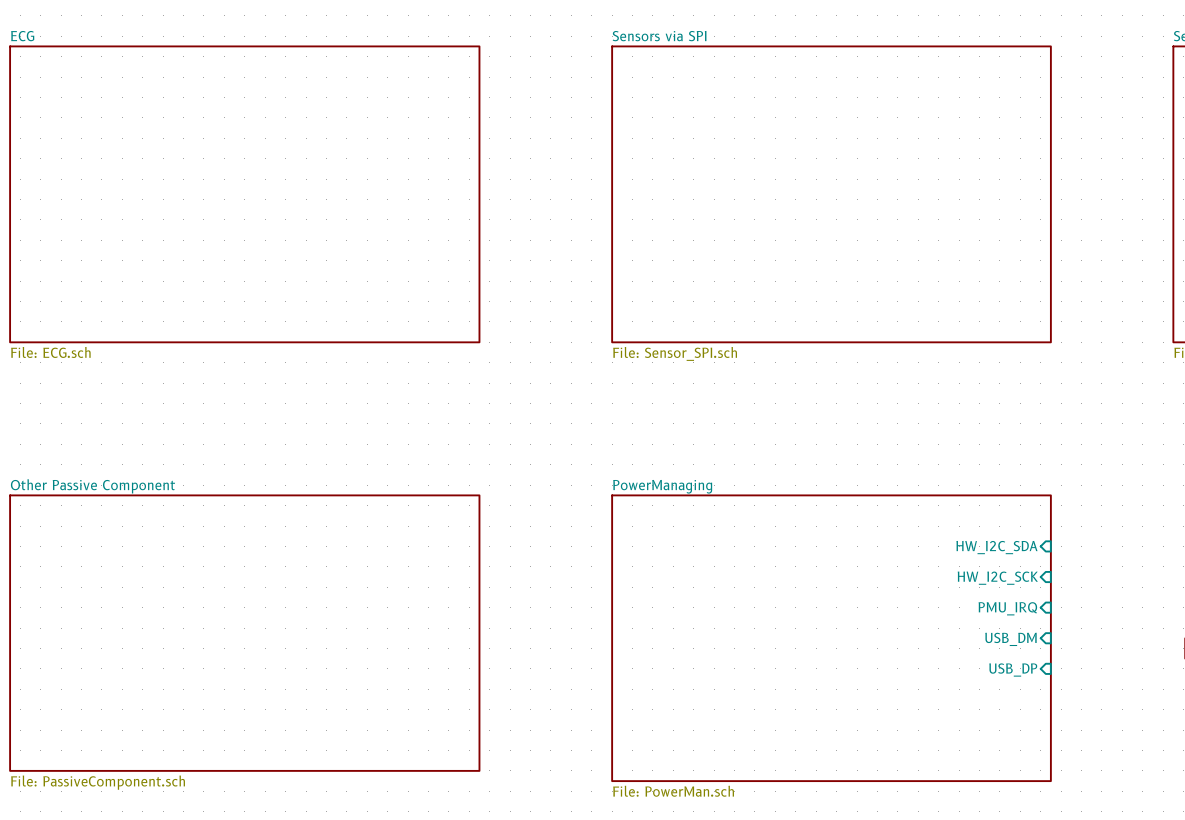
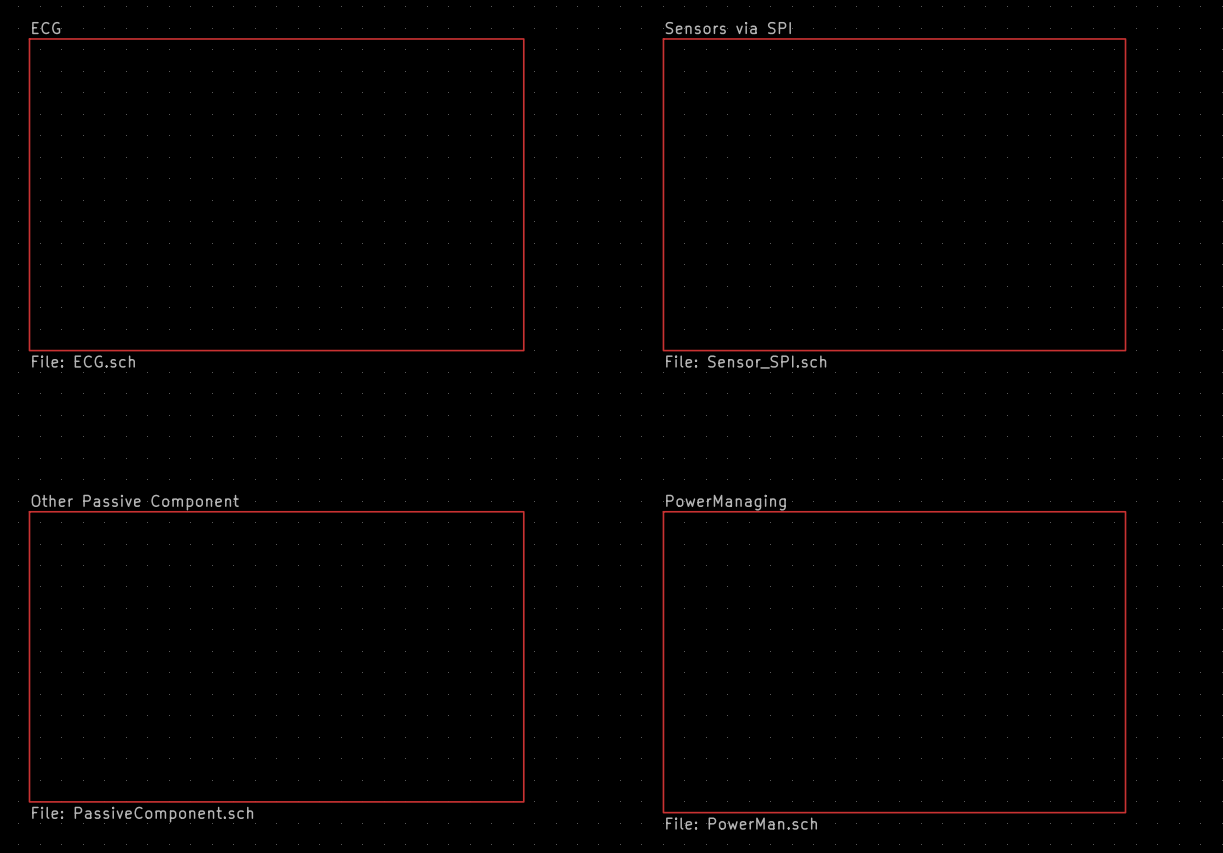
sheet pin: HW_I2C_SDA (996, 547) -> none
sheet pin: HW_I2C_SCK (997, 578) -> none
sheet pin: PMU_IRQ (1007, 608) -> none
sheet pin: USB_DM (1010, 639) -> none
sheet pin: USB_DP (1013, 670) -> none

